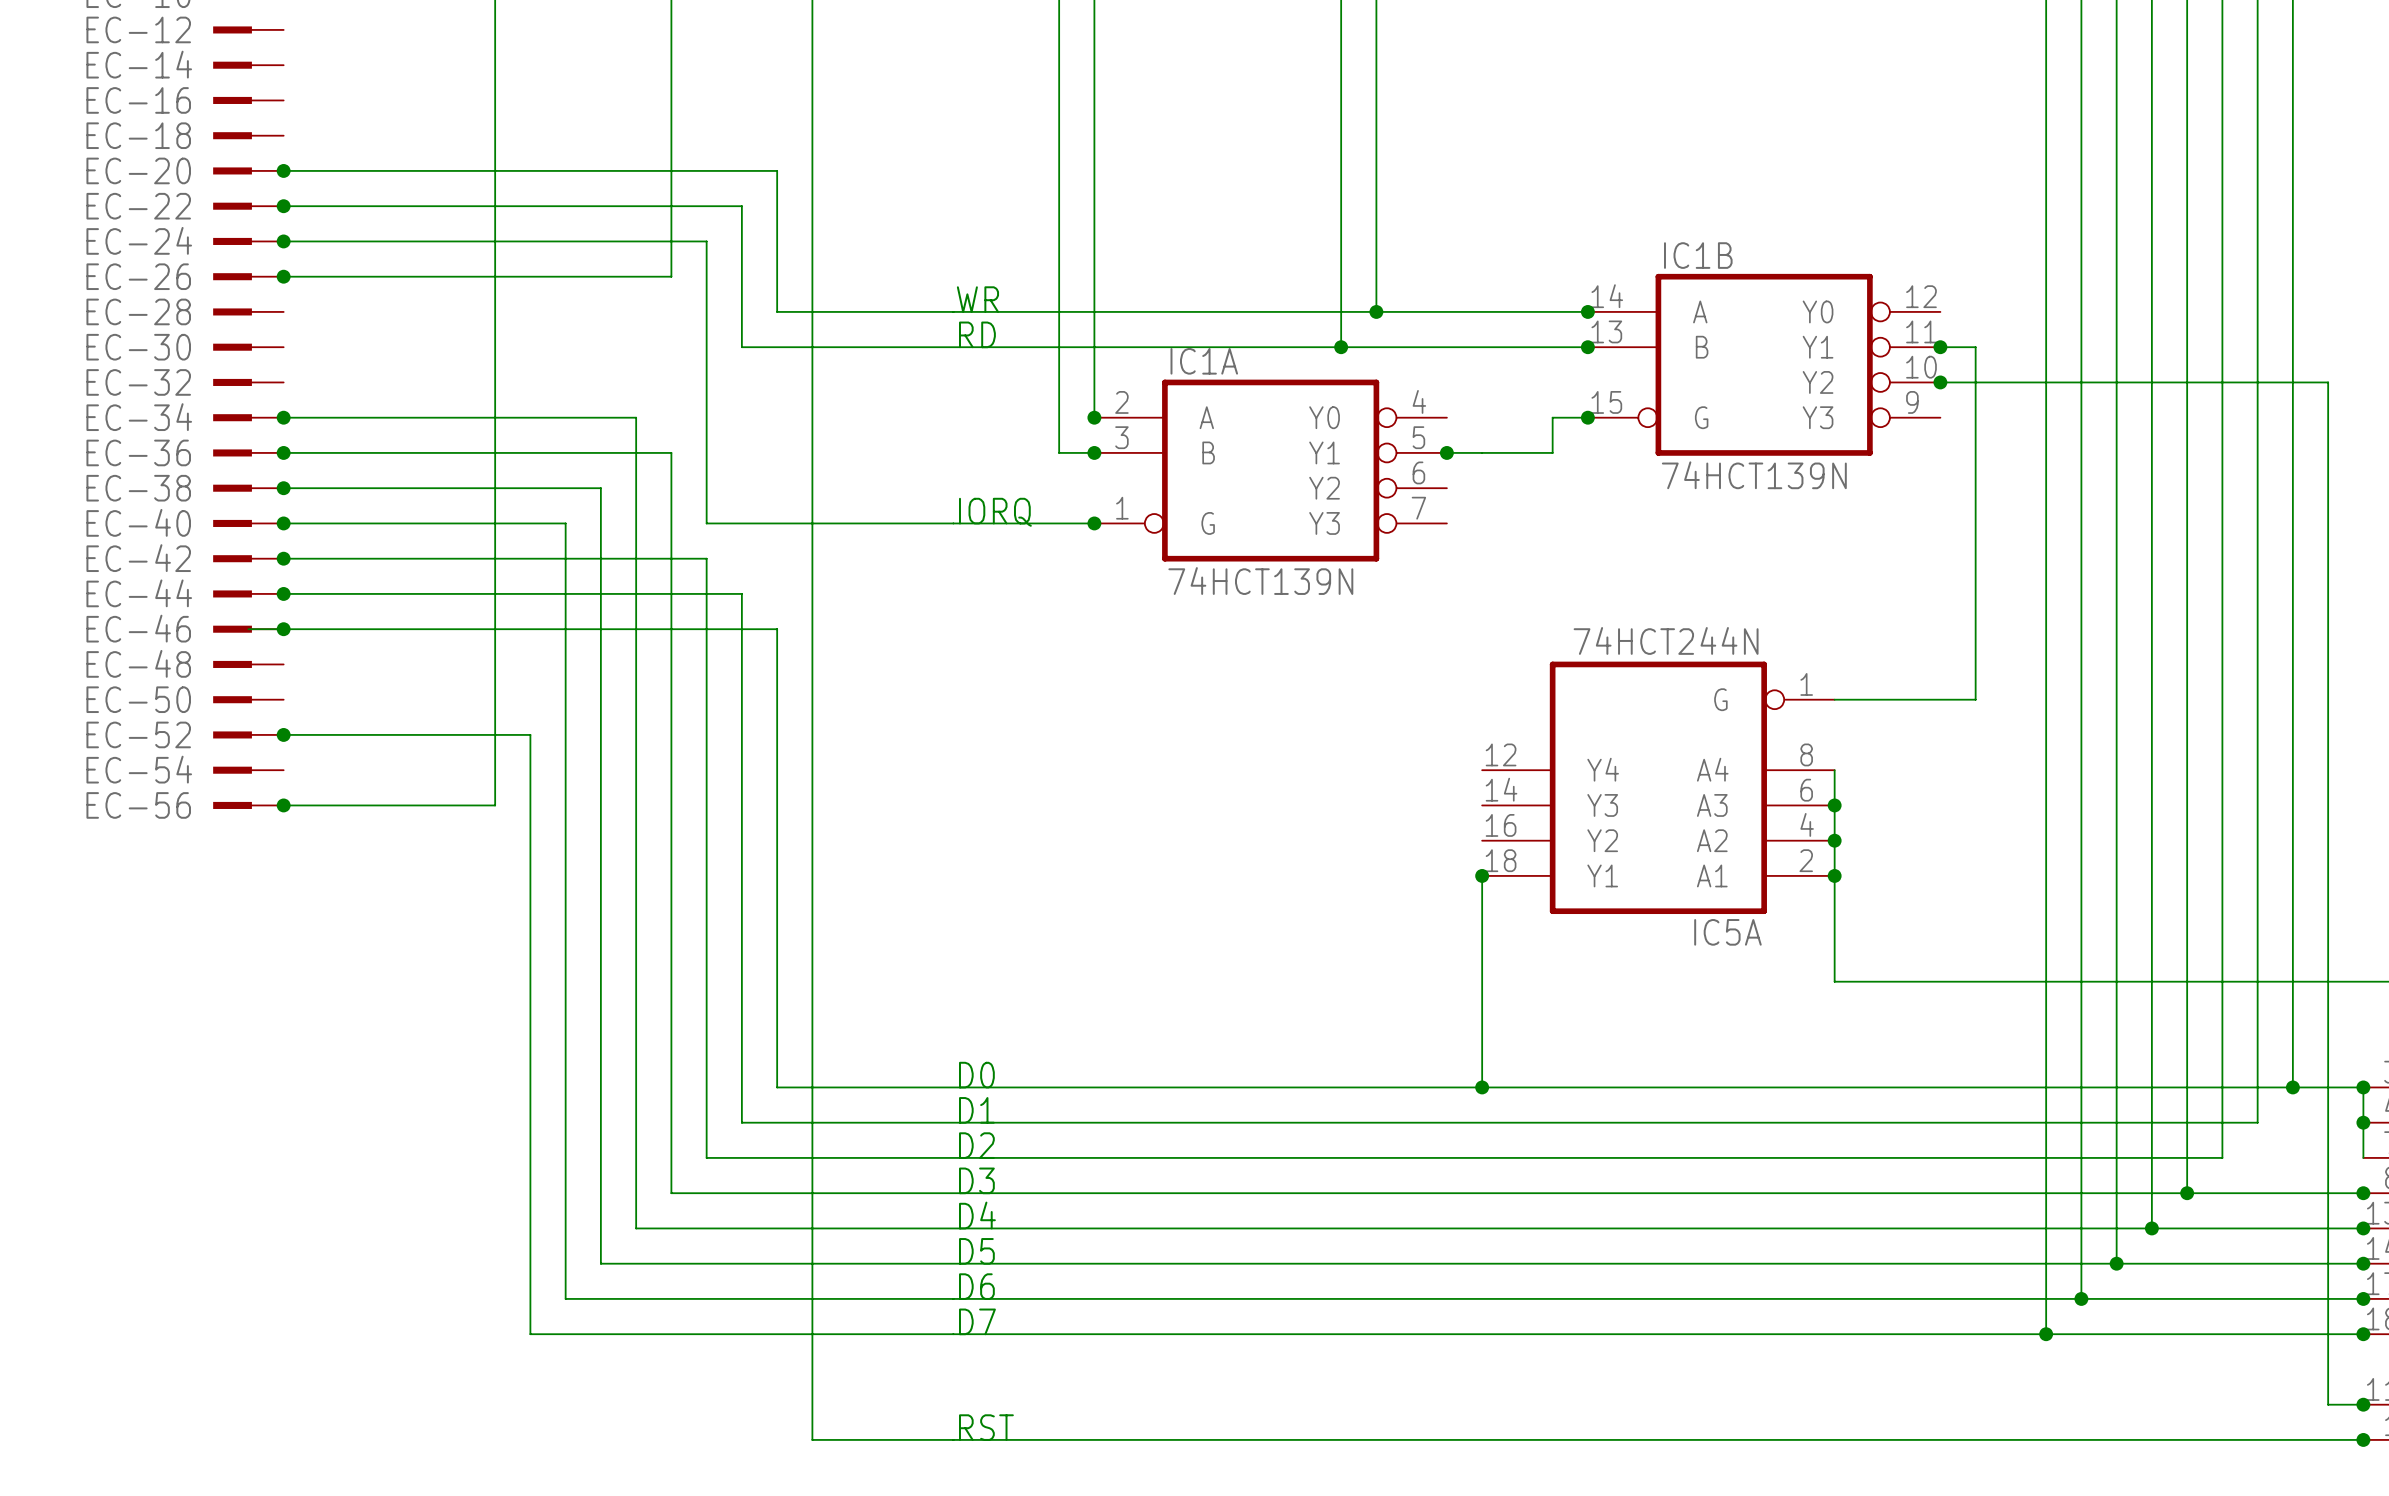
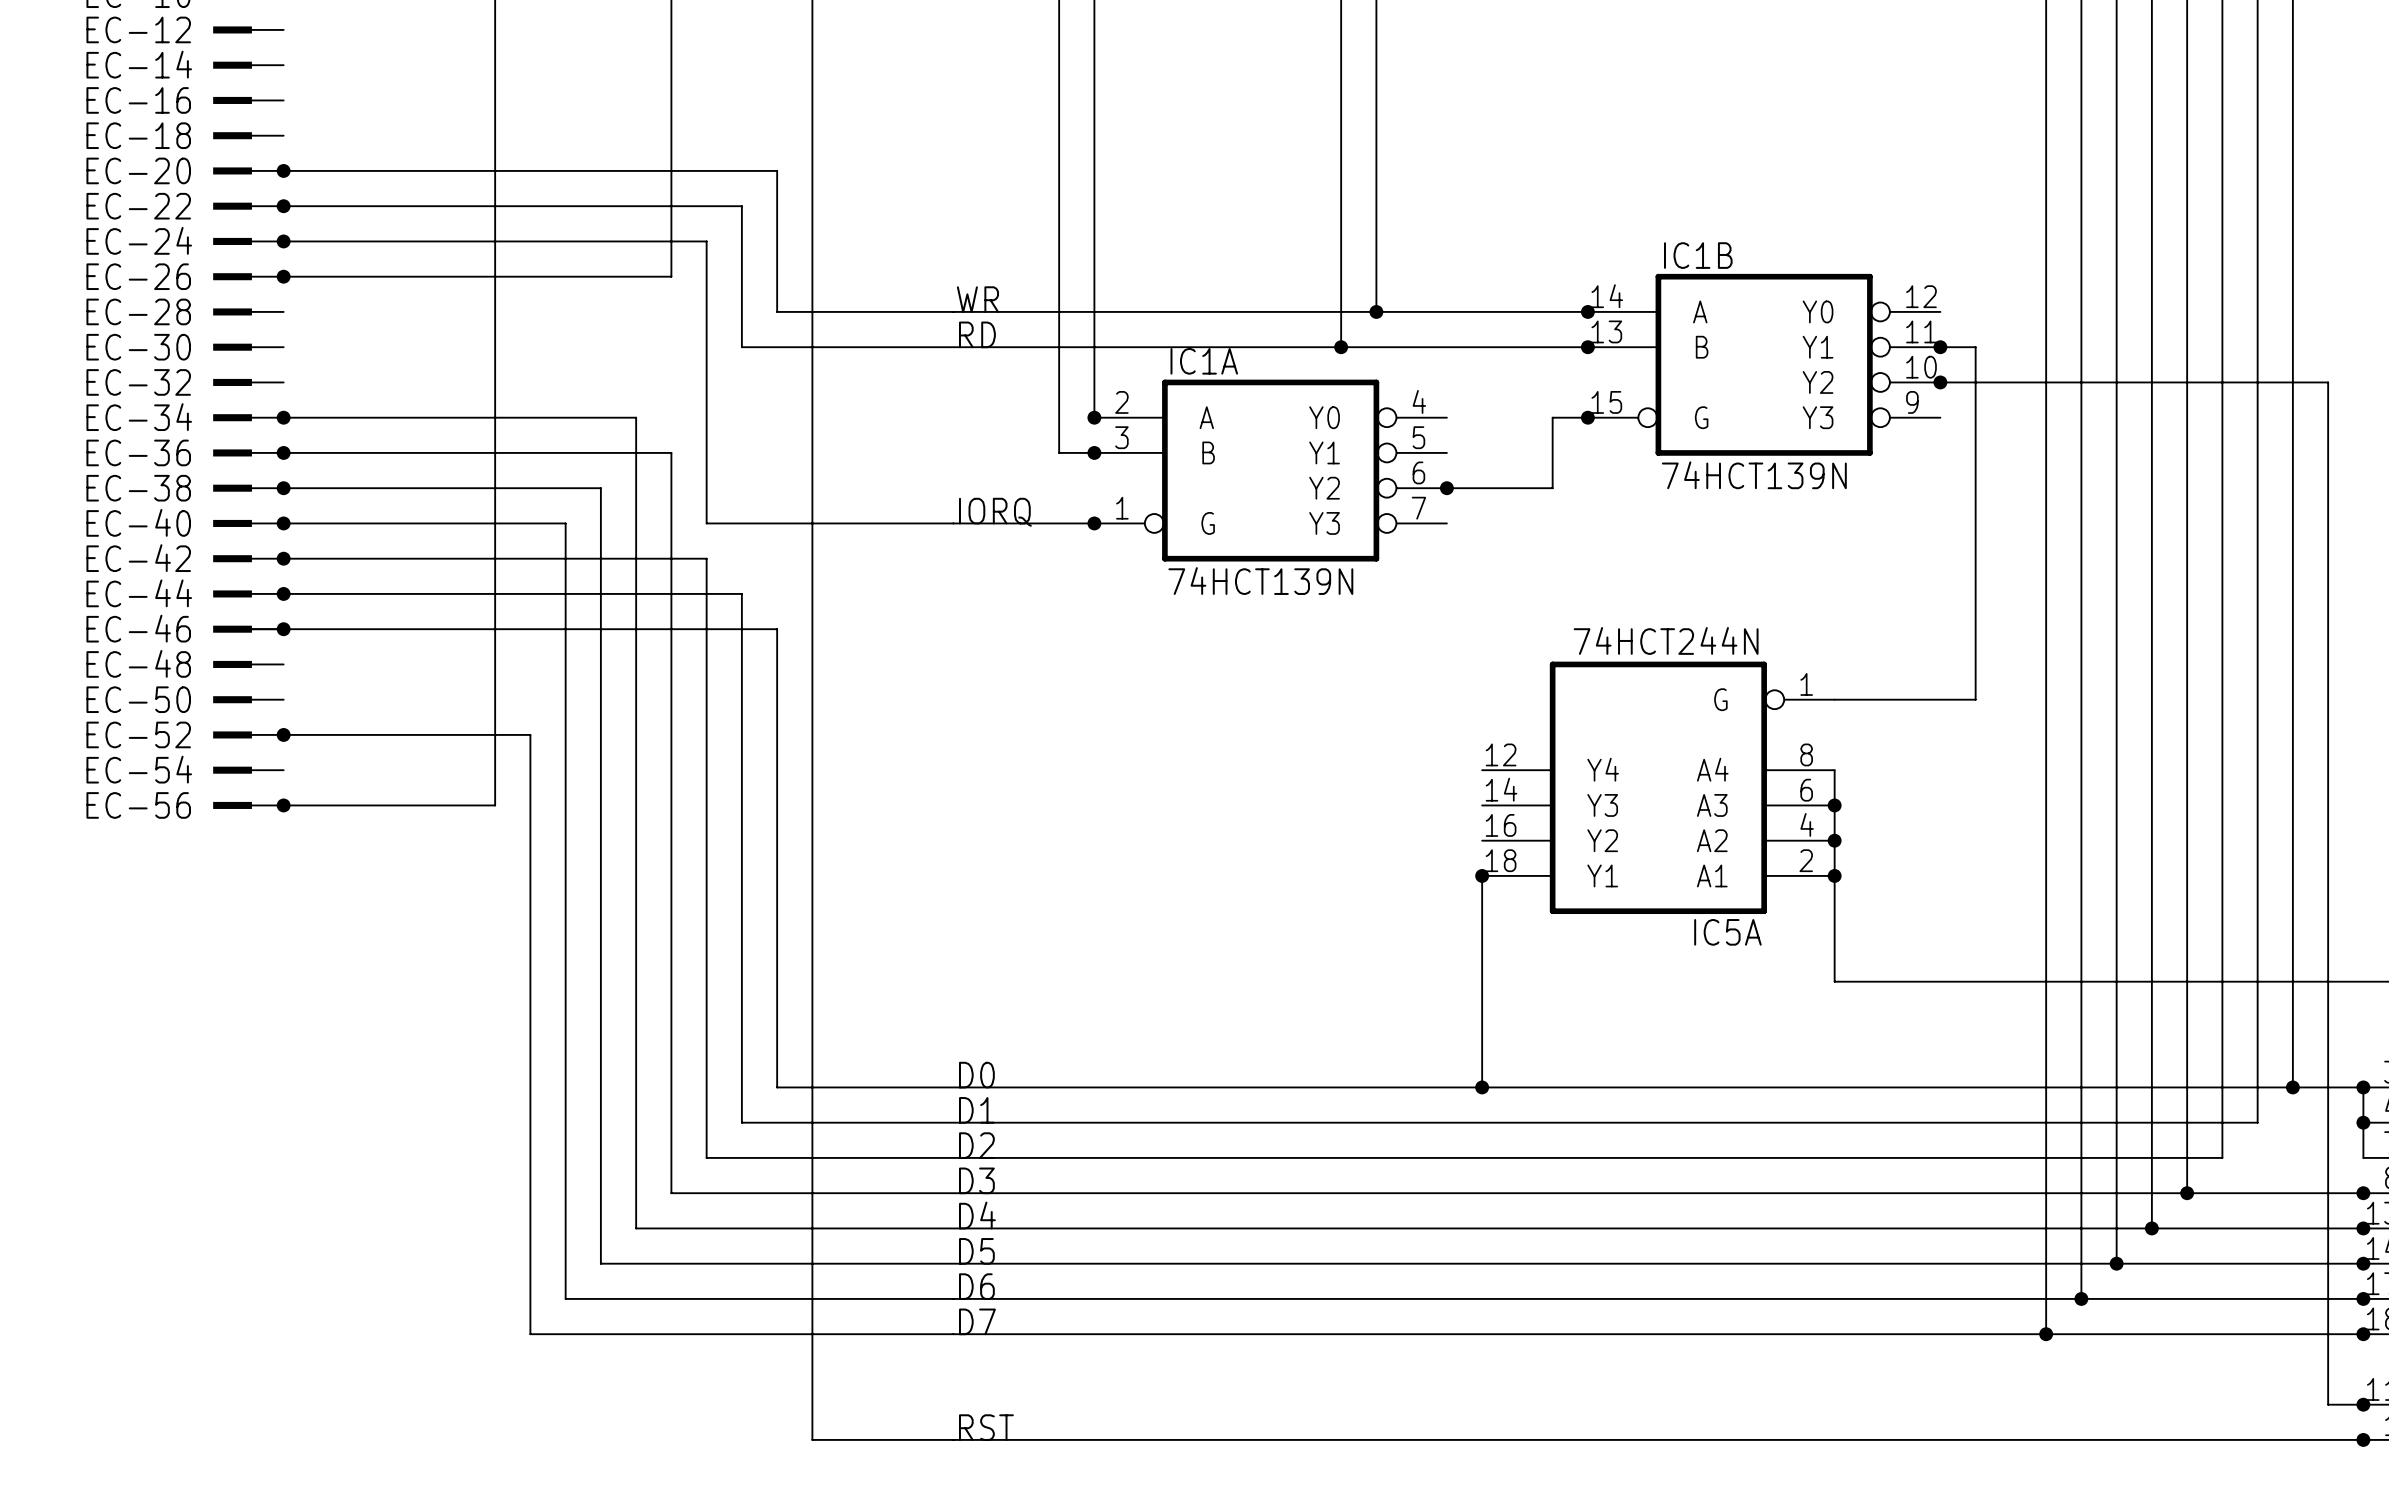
wire: (1446, 452) (1552, 452) -> (1446, 488) (1552, 488) (1552, 452)
junction position: (1446, 452) -> (1446, 488)

